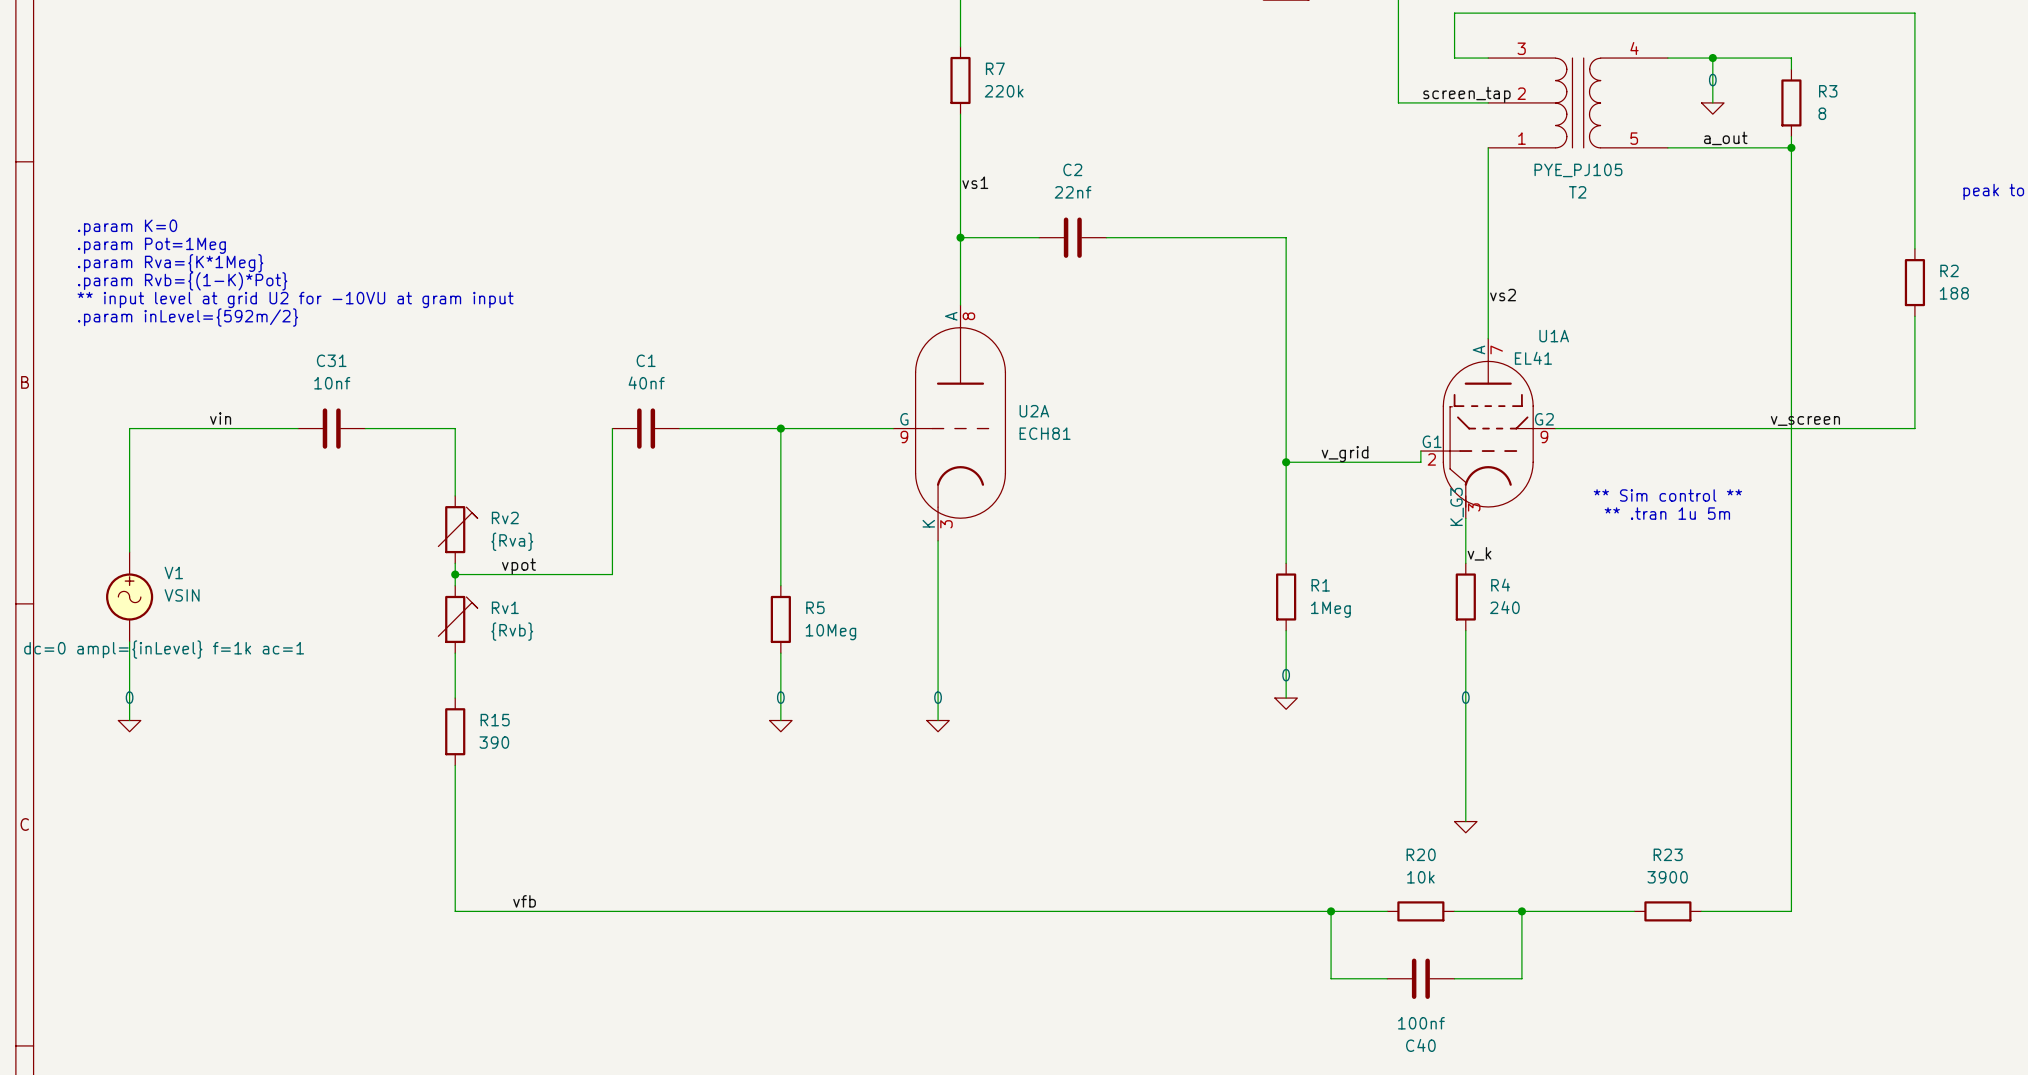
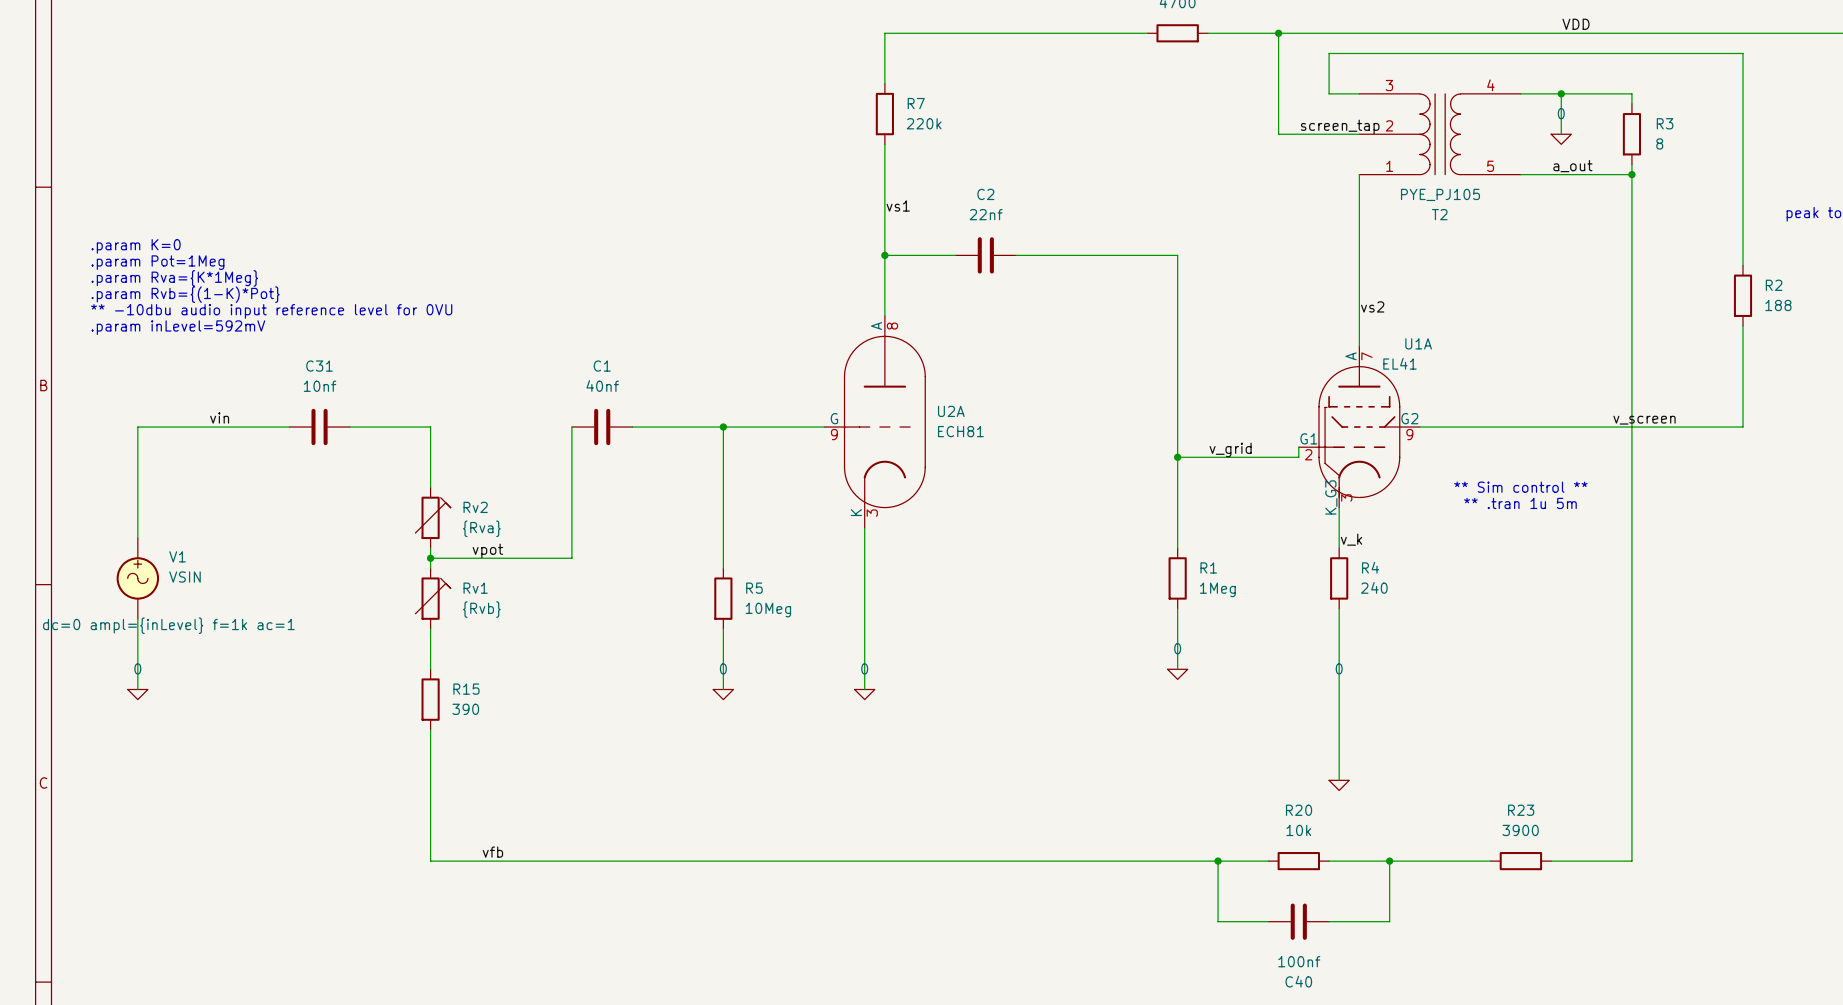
text: ** input level at grid U2 for -10VU at gram input (295, 299) -> ** -10dbu audio input reference level for 0VU (271, 311)
text: .param inLevel={592m/2} (188, 317) -> .param inLevel=592mV (178, 327)

